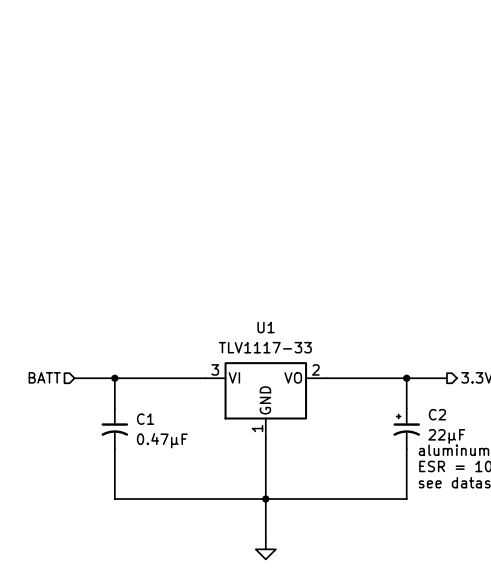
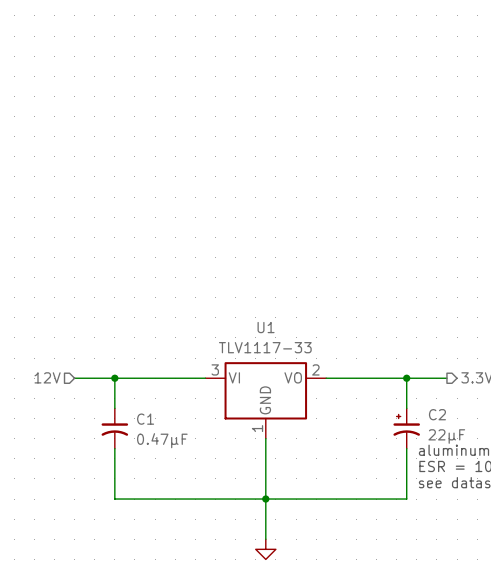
hierarchical label: BATT (44, 377) -> 12V (47, 377)

